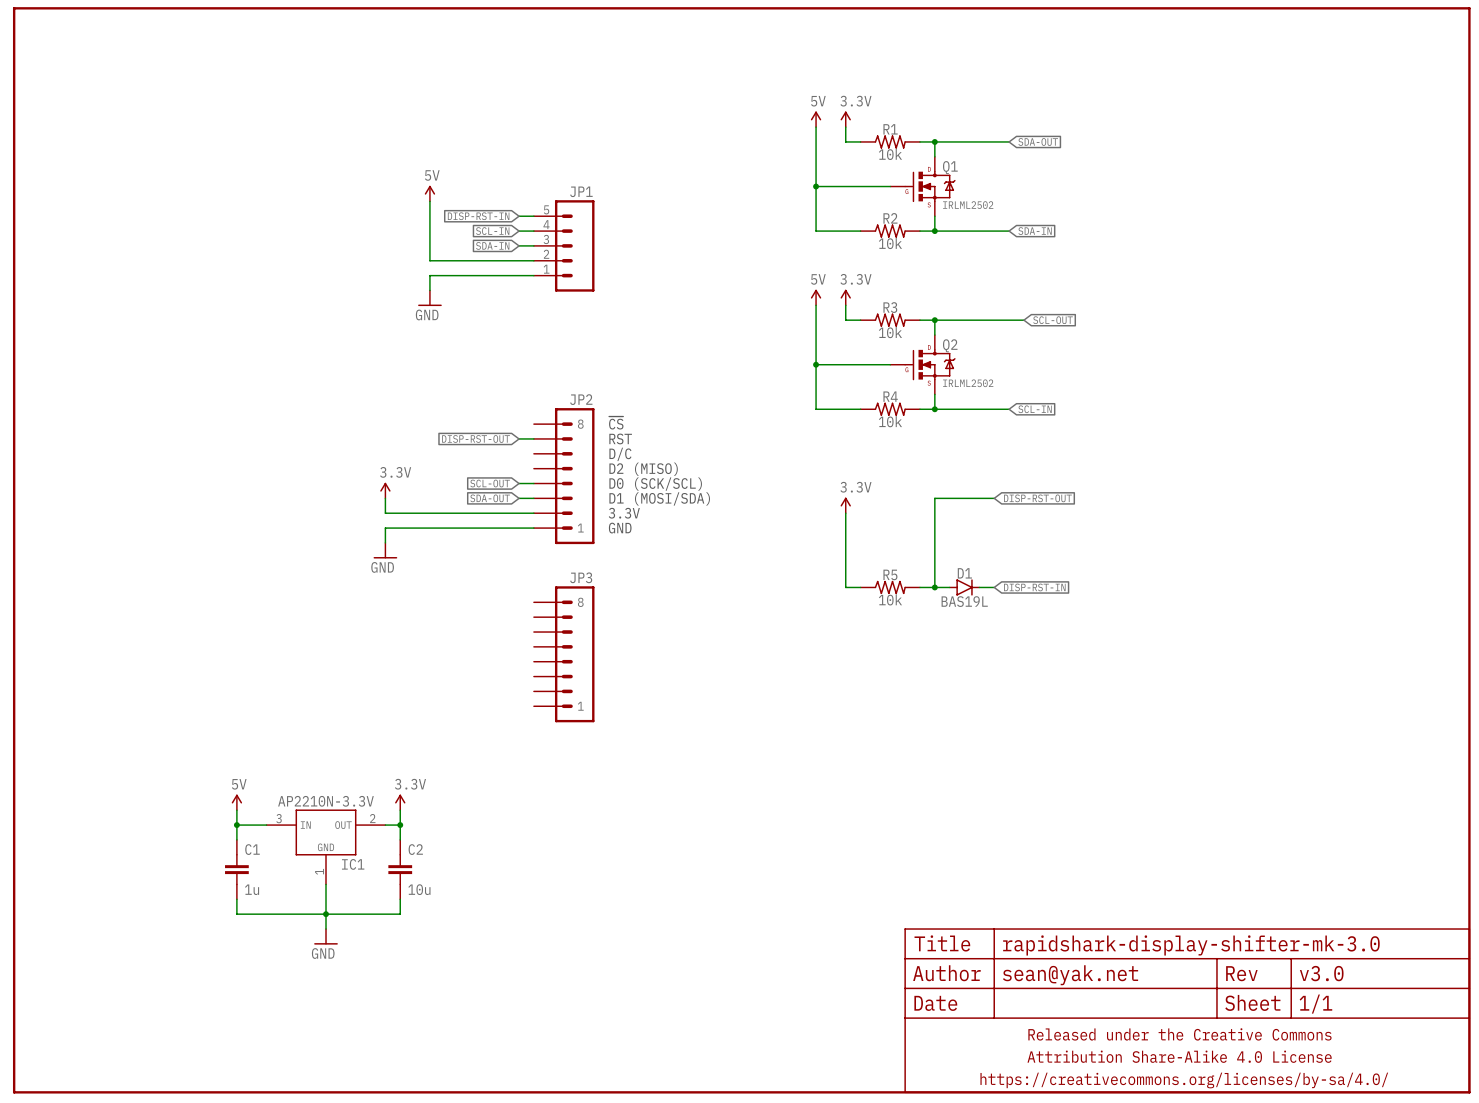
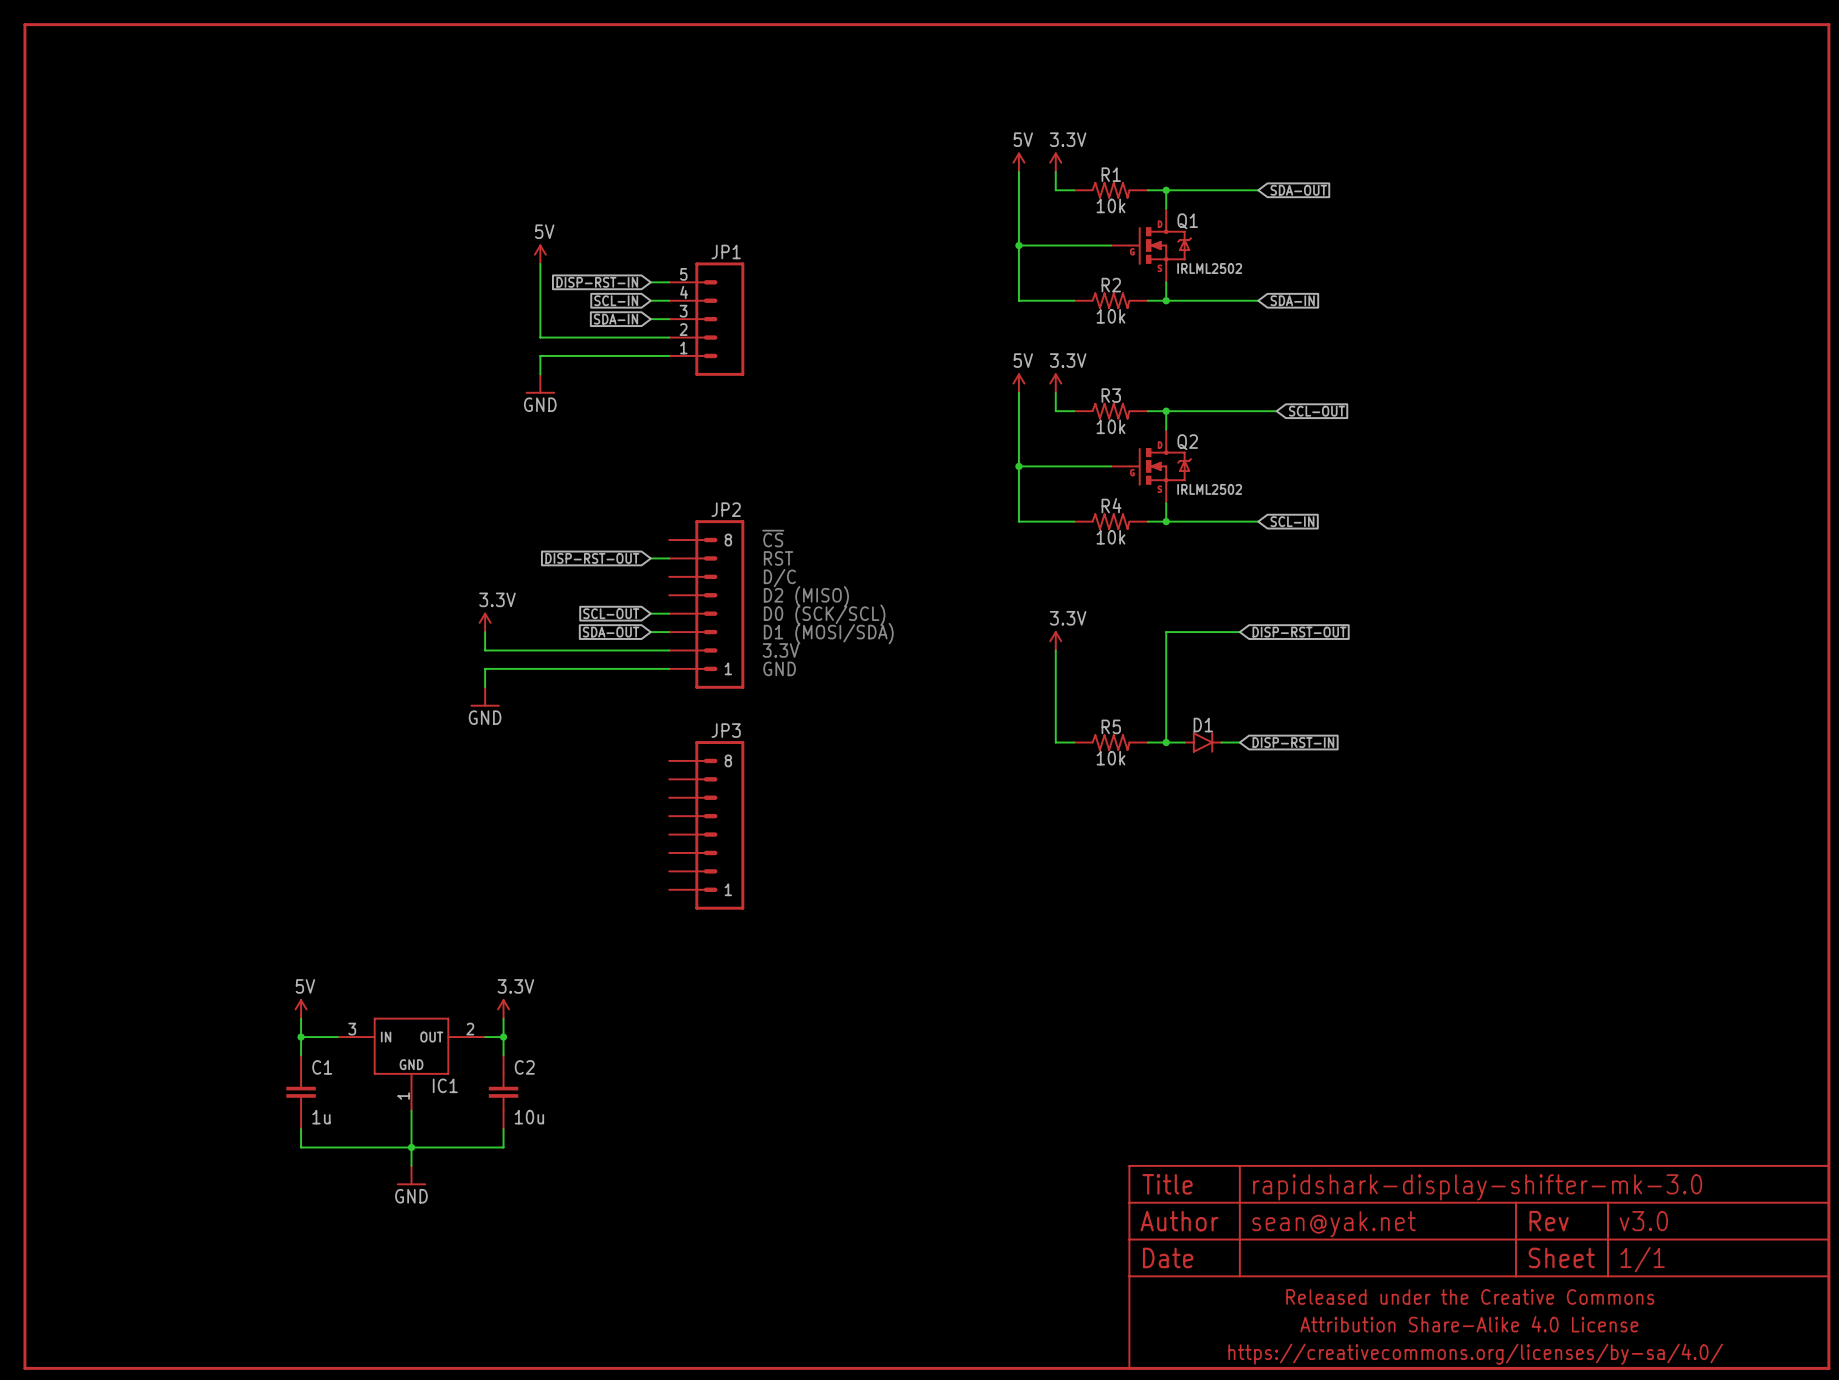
D1 value: BAS19L (964, 601) -> none
IC1 value: AP2210N-3.3V (325, 801) -> none

